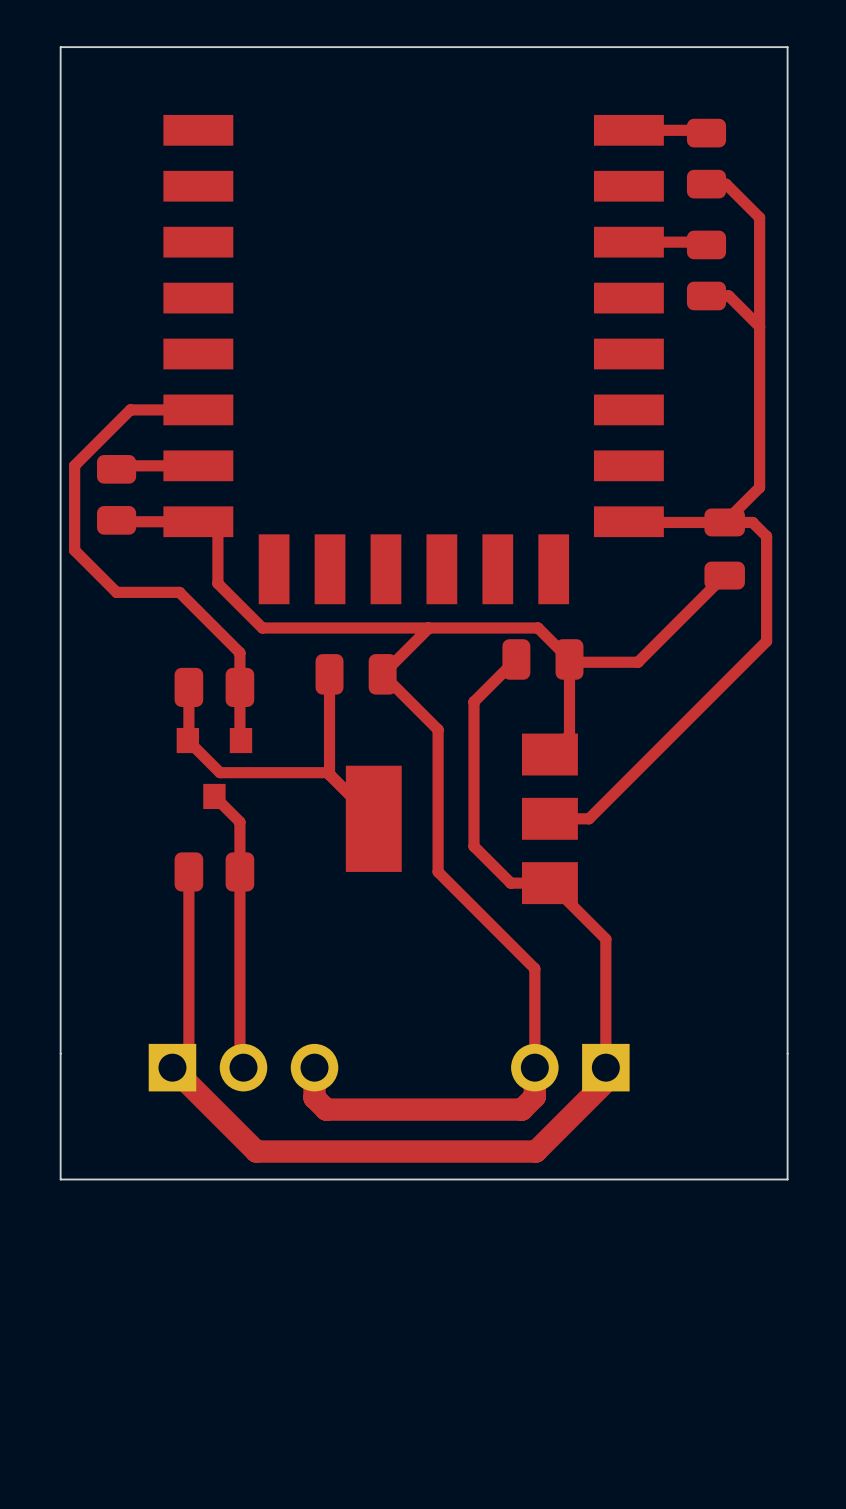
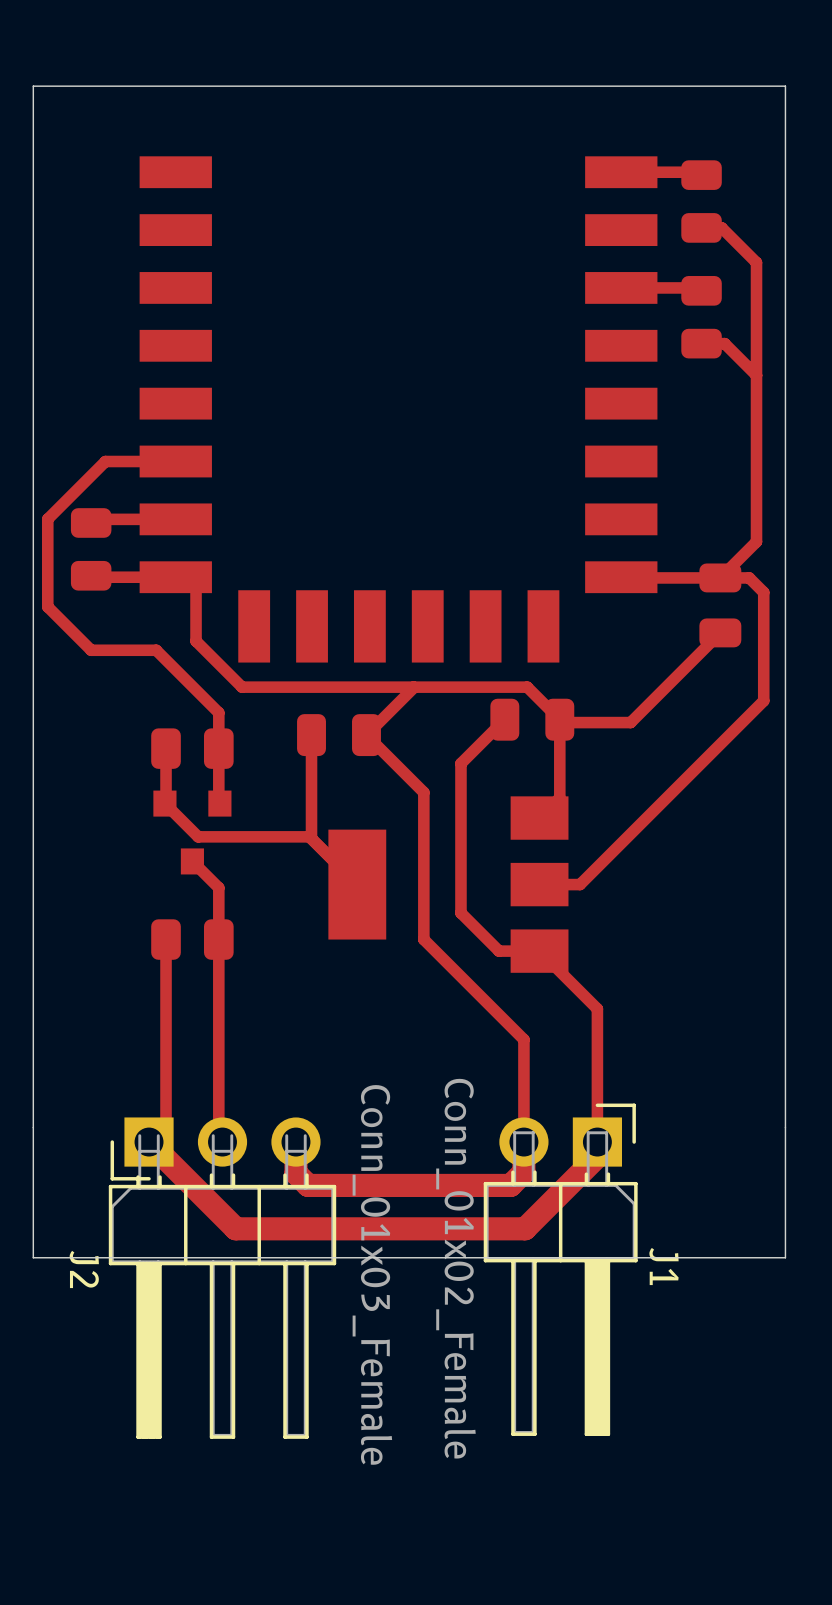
J2 side: top (243, 1067) -> bottom (222, 1278)
J1 side: top (570, 1067) -> bottom (560, 1269)

